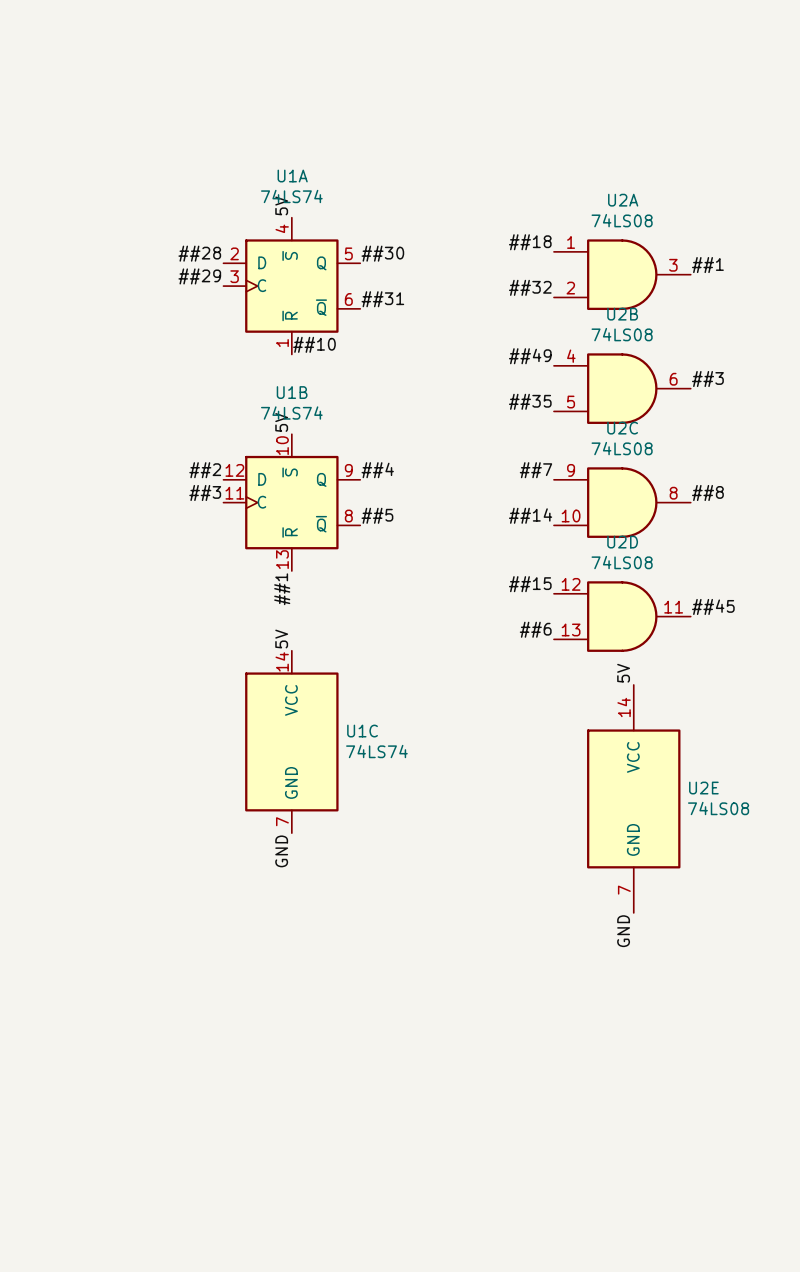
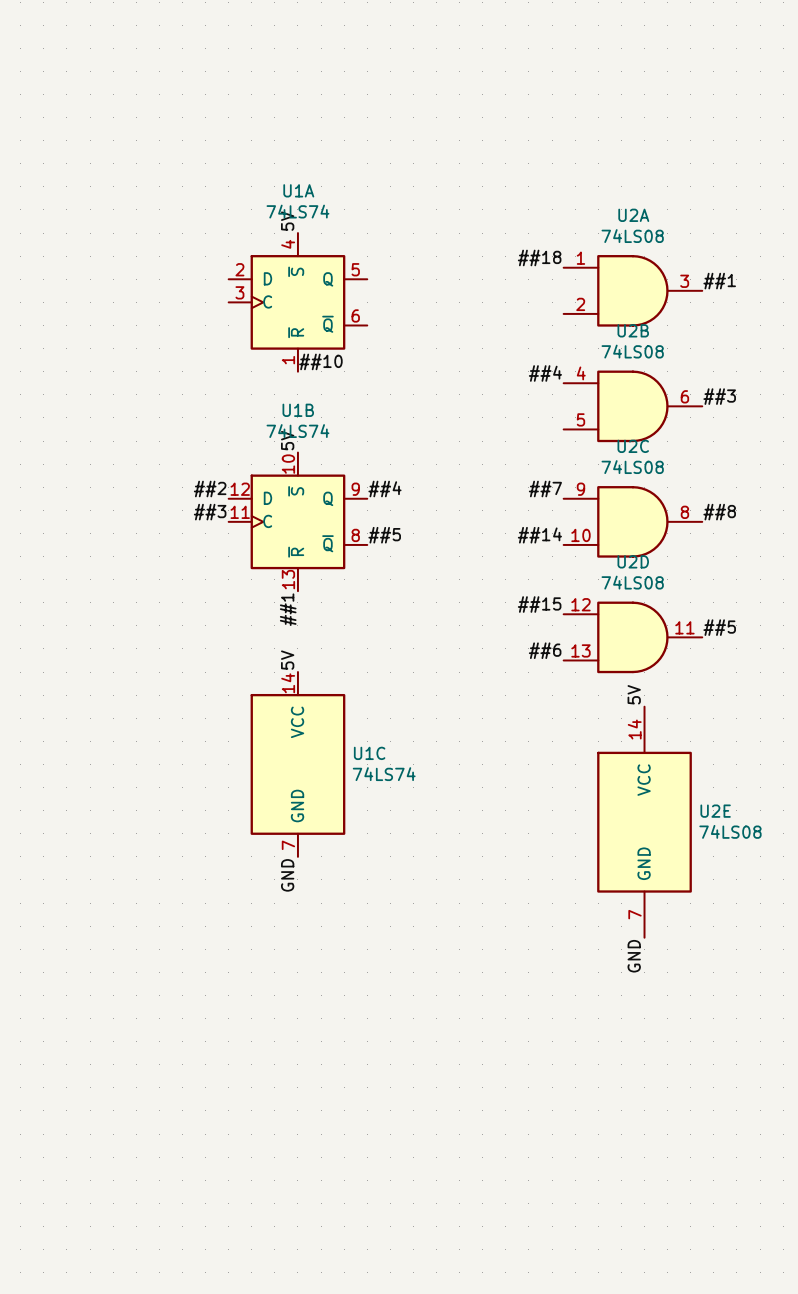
label: ##28 (199, 253) -> none
label: ##30 (382, 253) -> none
label: ##29 (199, 276) -> none
label: ##32 (530, 287) -> none
label: ##31 (382, 299) -> none
label: ##49 (530, 356) -> ##4 (545, 373)
label: ##35 (530, 401) -> none
label: ##45 (713, 606) -> ##5 (719, 627)

